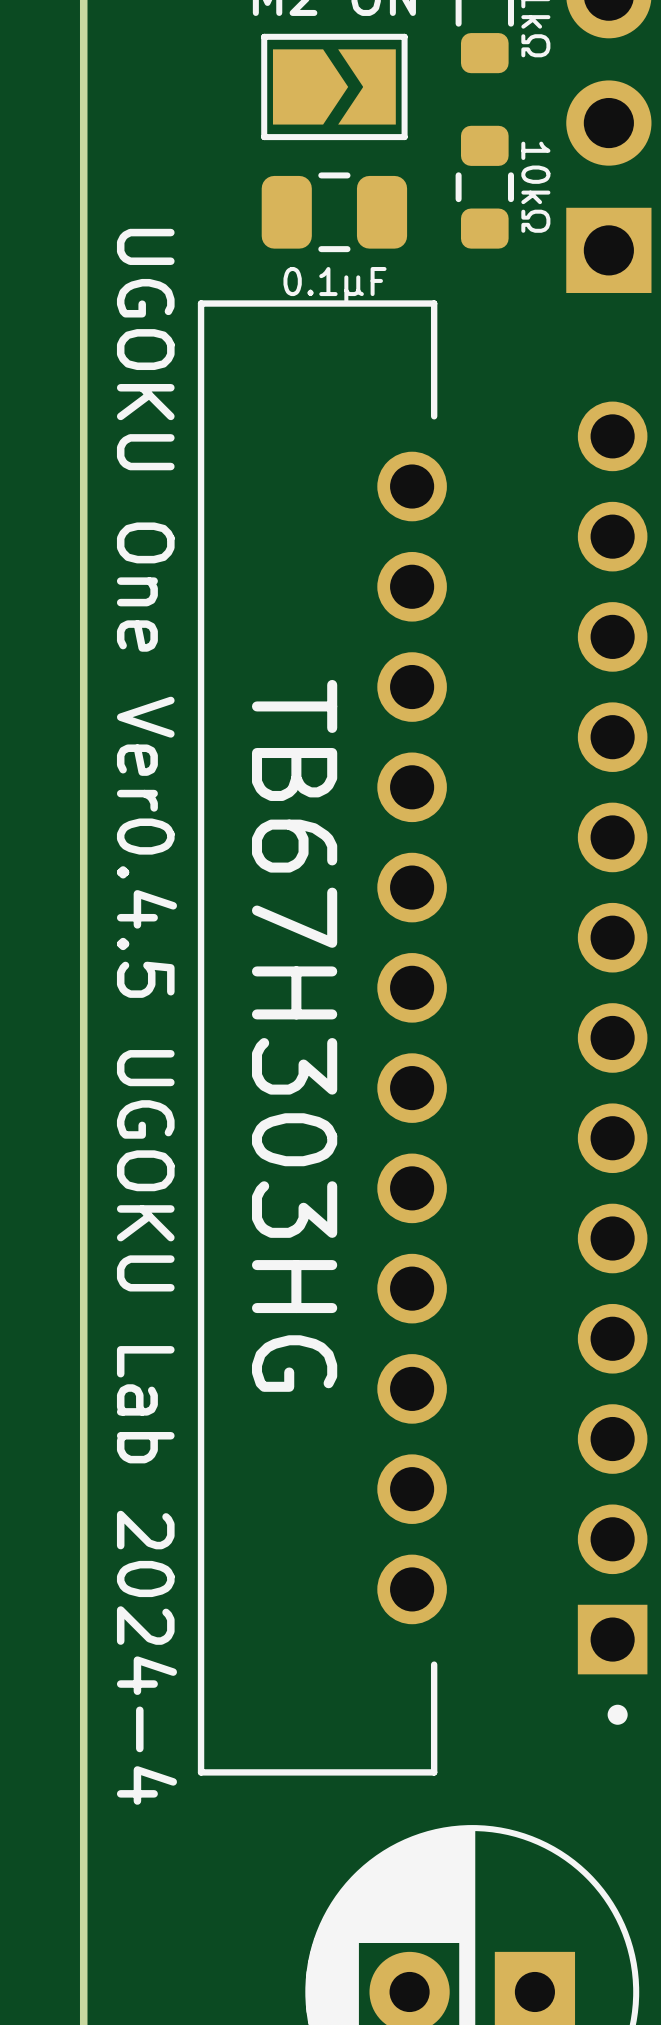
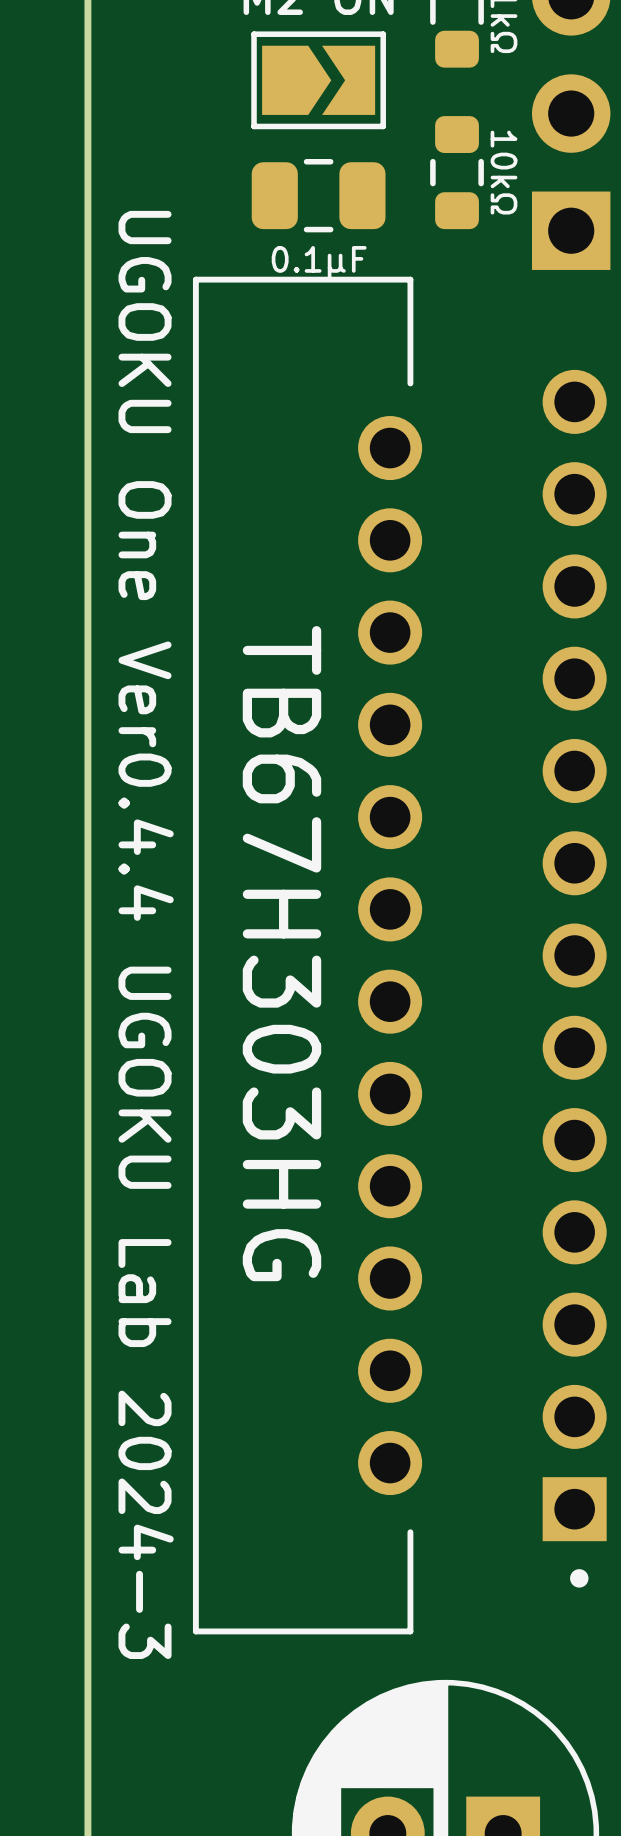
text: UGOKU One Ver0.4.5 UGOKU Lab 2024-4 (146, 1016) -> UGOKU One Ver0.4.4 UGOKU Lab 2024-3 (146, 934)

